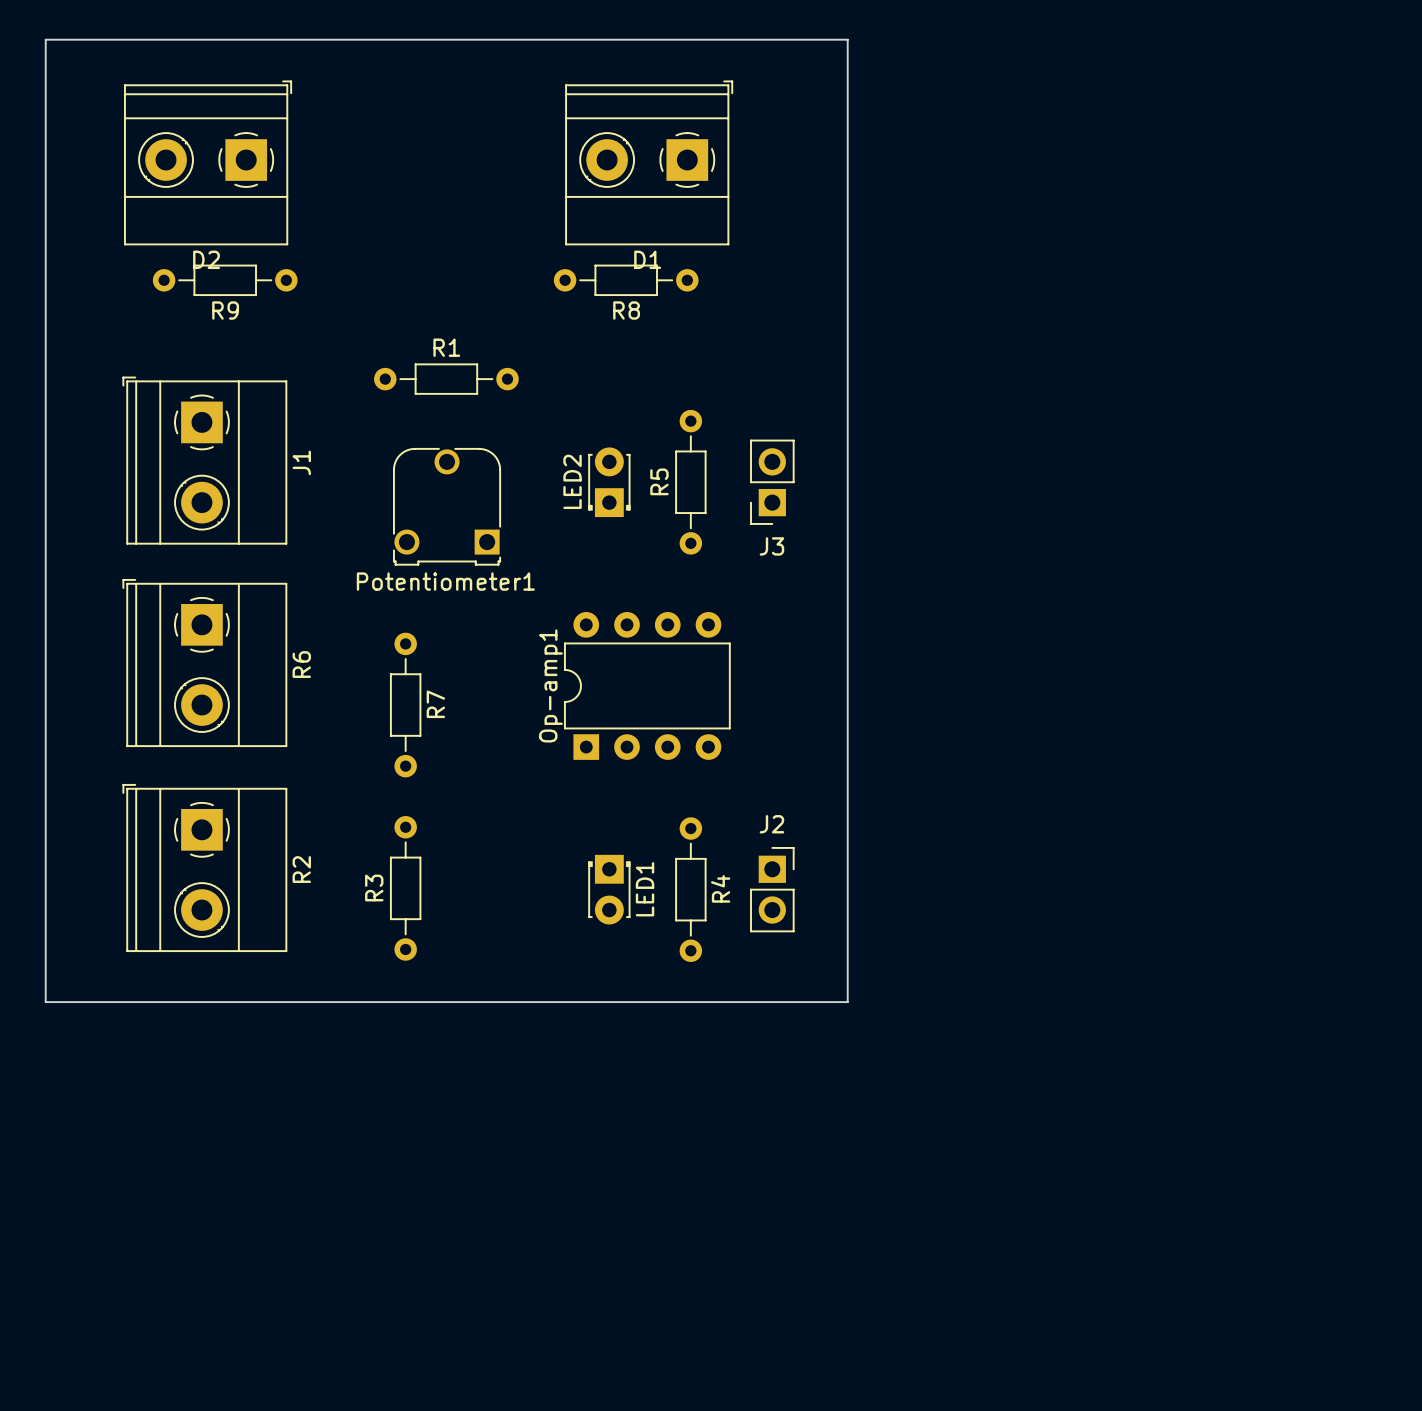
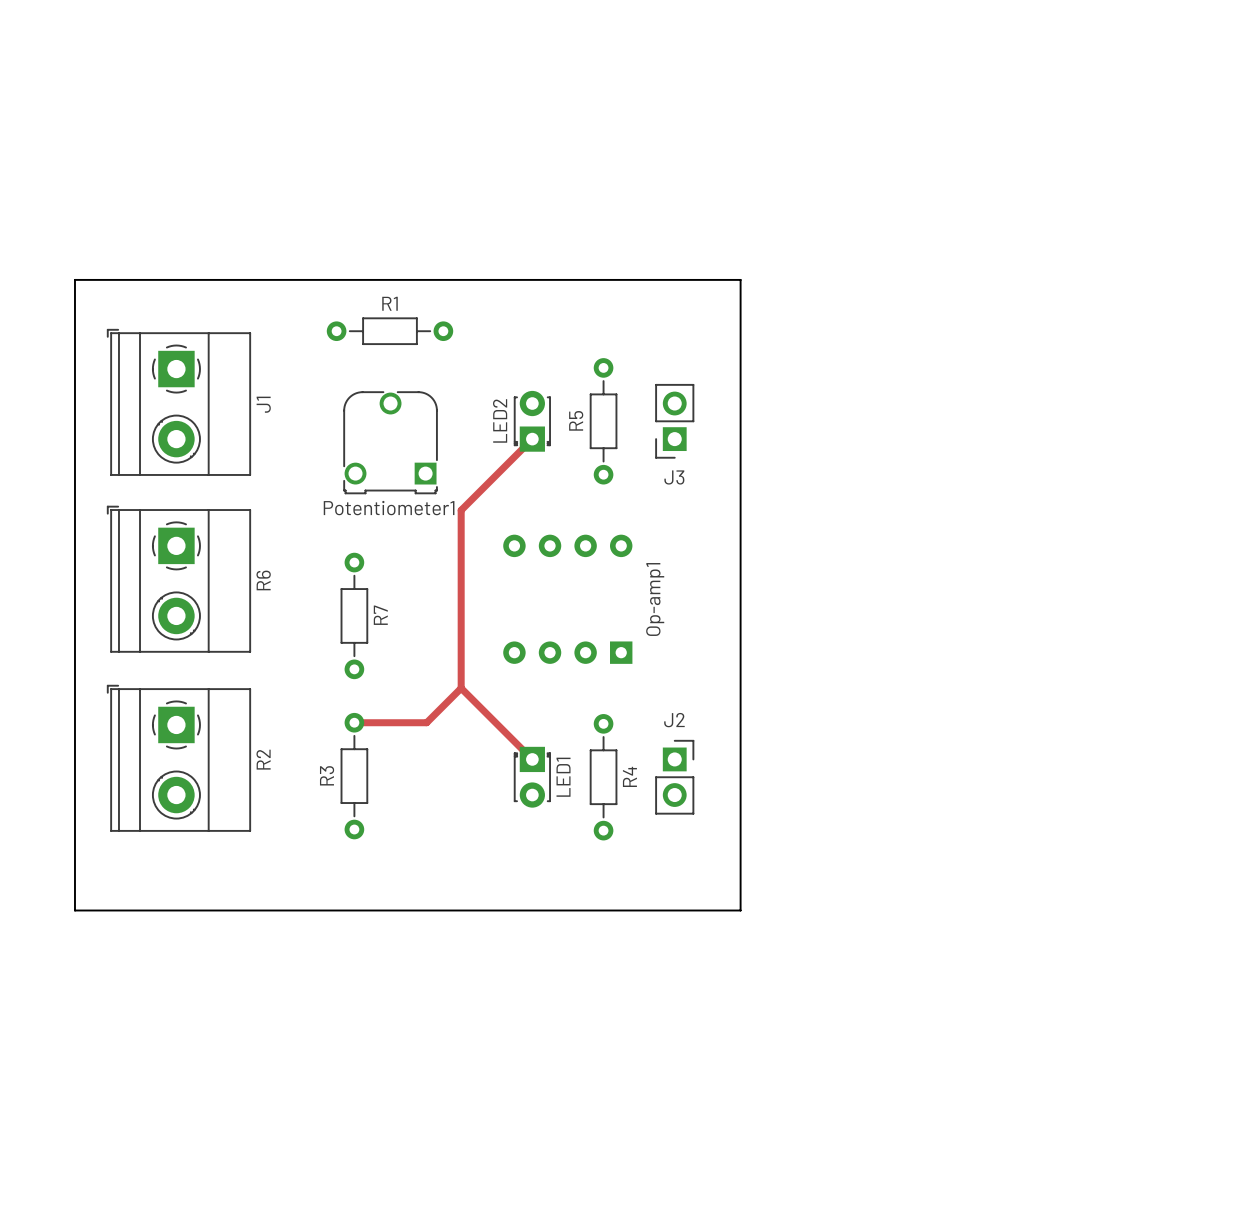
D2: (208, 162) -> none
D1: (649, 162) -> none
R9: (225, 280) -> none
R8: (626, 280) -> none
board edge: (847, 320) (847, 39) (45, 39) (45, 1002) (847, 1002) -> (740, 279) (74, 279) (74, 910) (740, 910) (740, 875)
track: none -> (532, 439) (461, 510) (461, 688)
Op-amp1 side: top (647, 685) -> bottom (567, 599)
track: none -> (461, 688) (426, 722) (354, 722)
track: none -> (461, 688) (532, 759)

